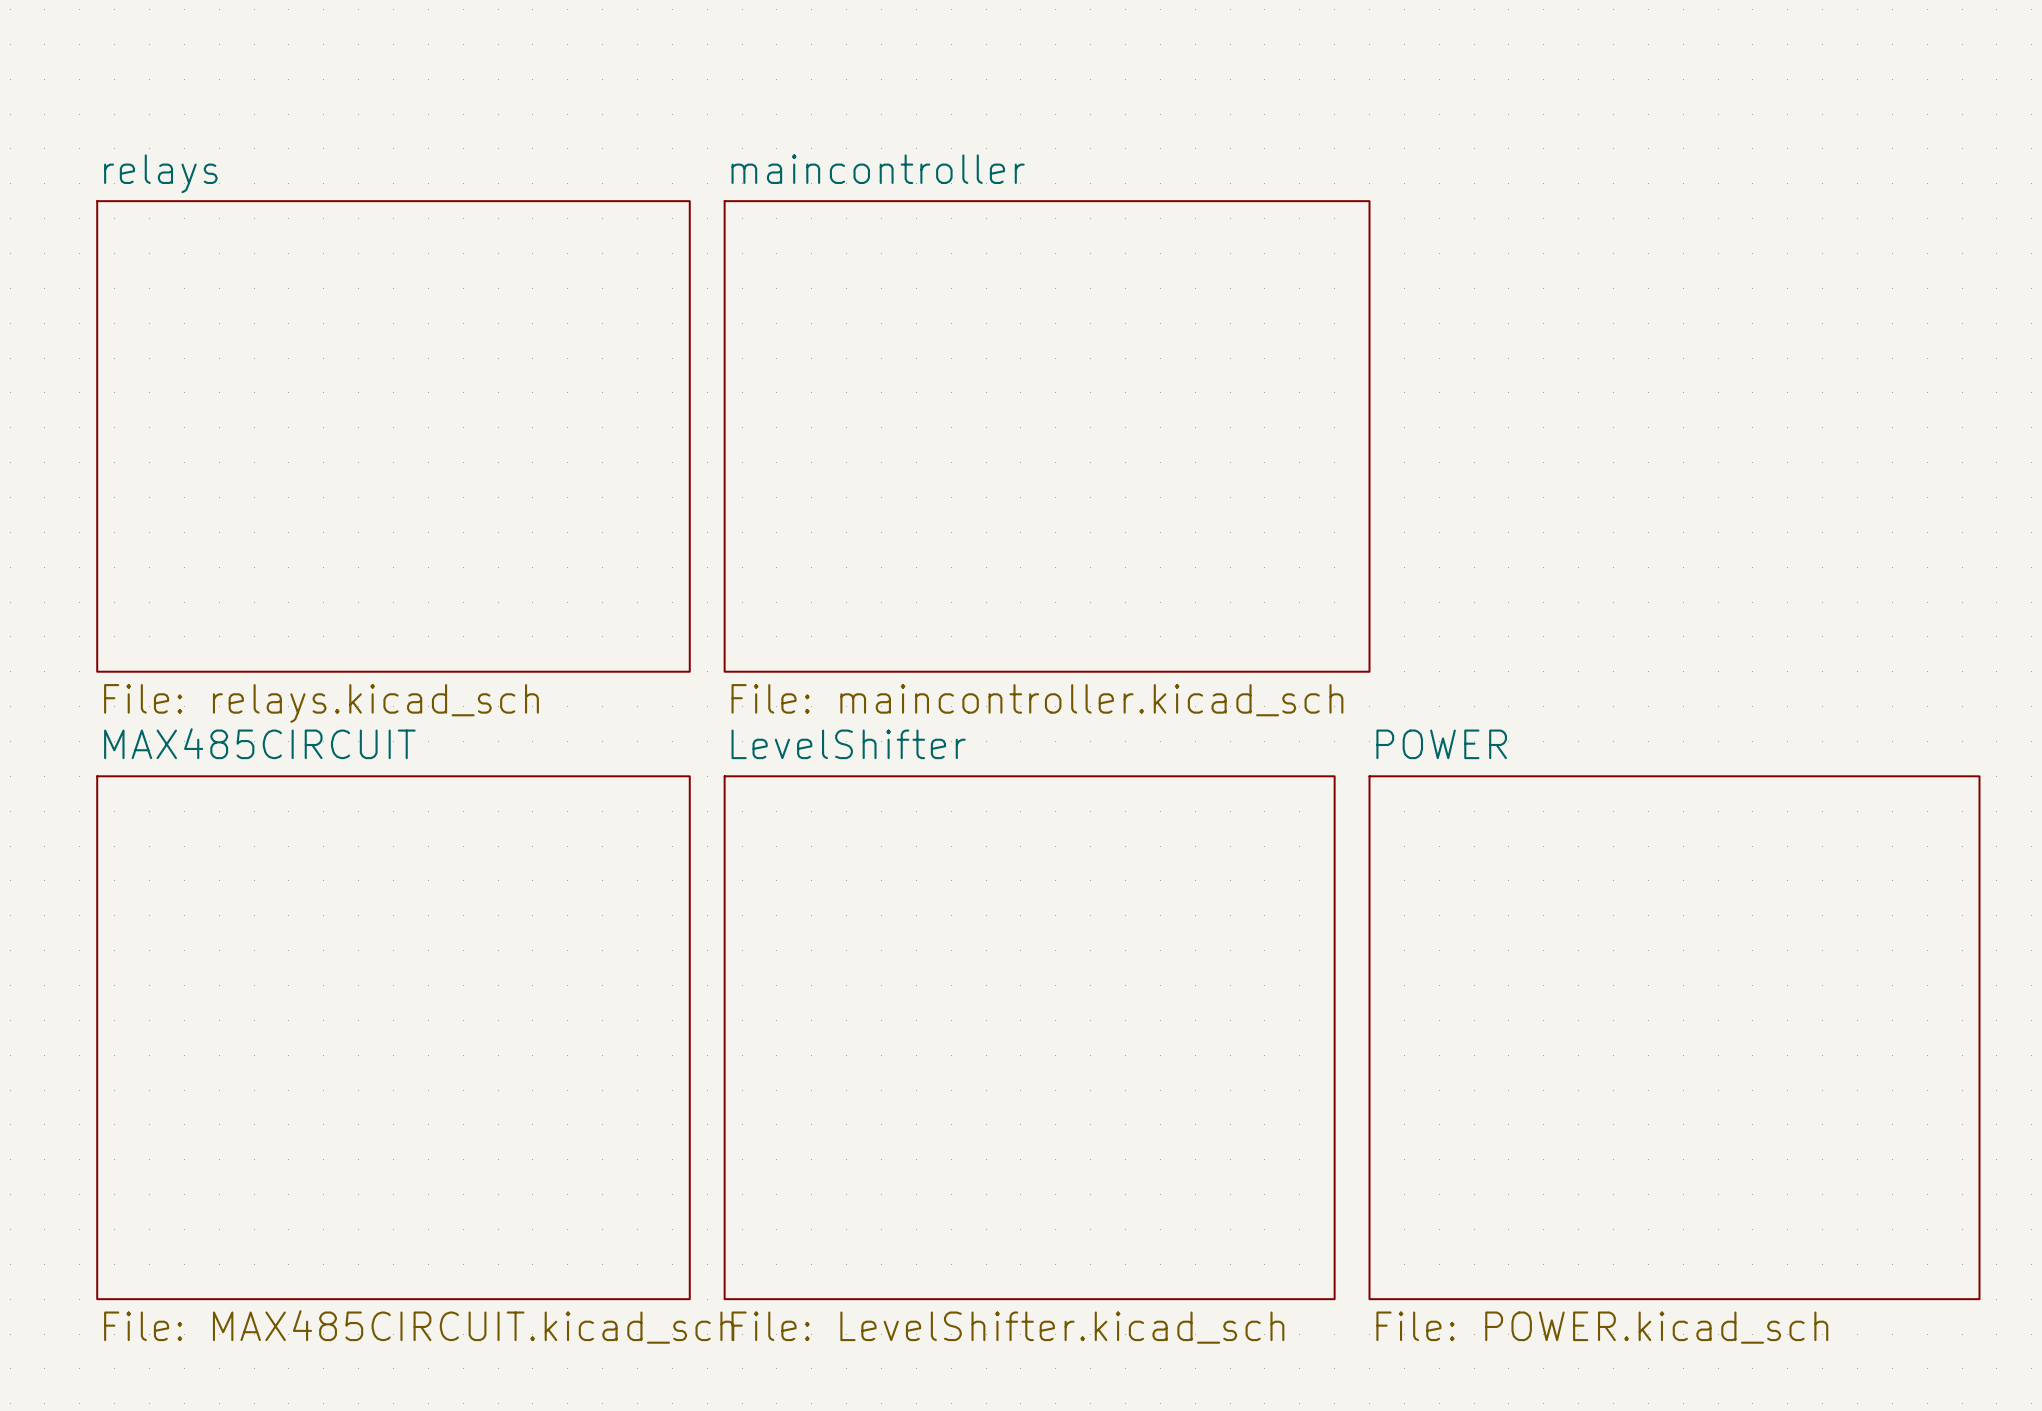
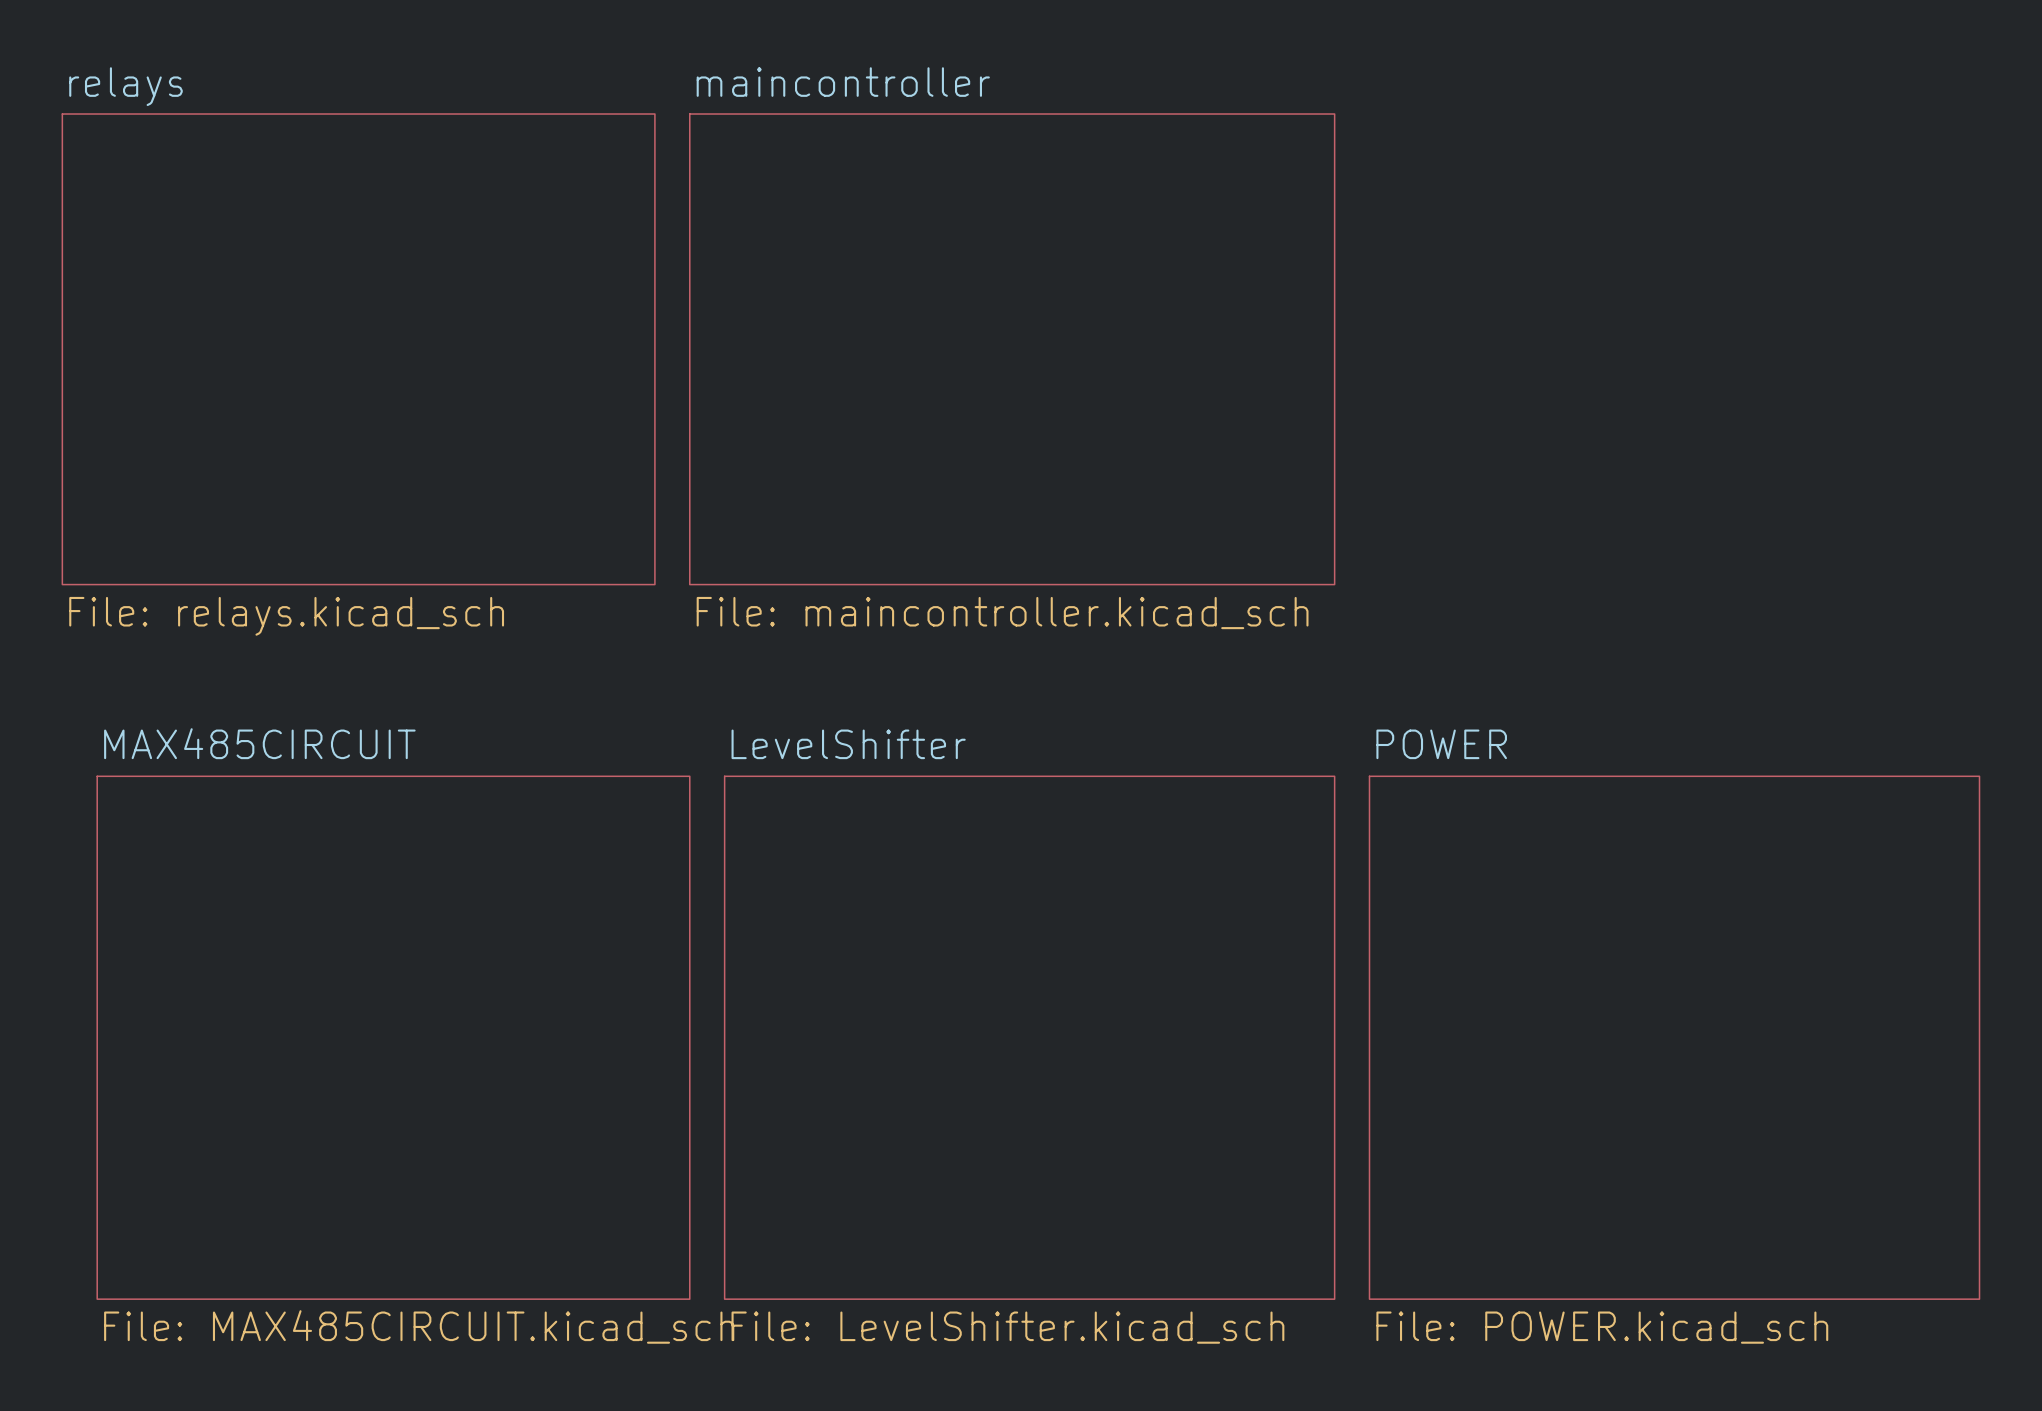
sheet relays position: (393, 436) -> (358, 349)
sheet maincontroller position: (1047, 436) -> (1012, 349)

